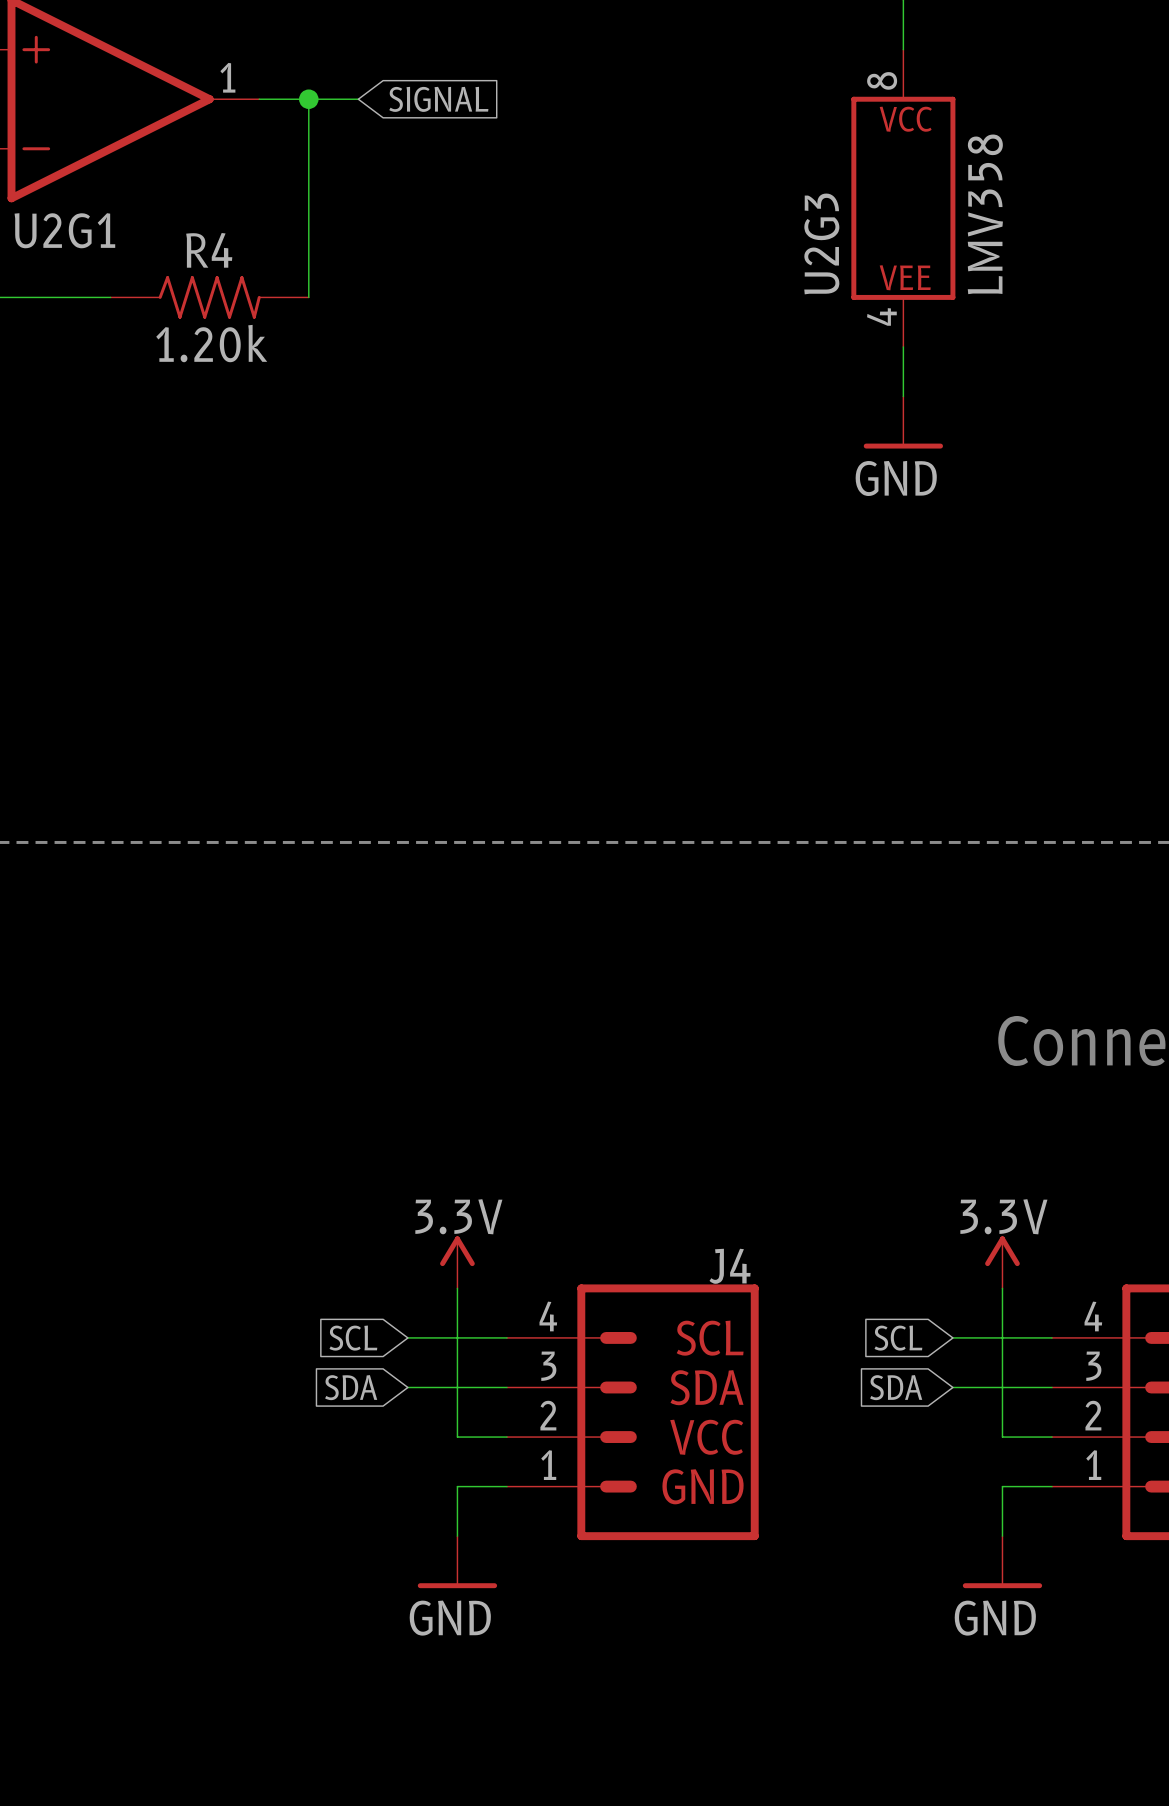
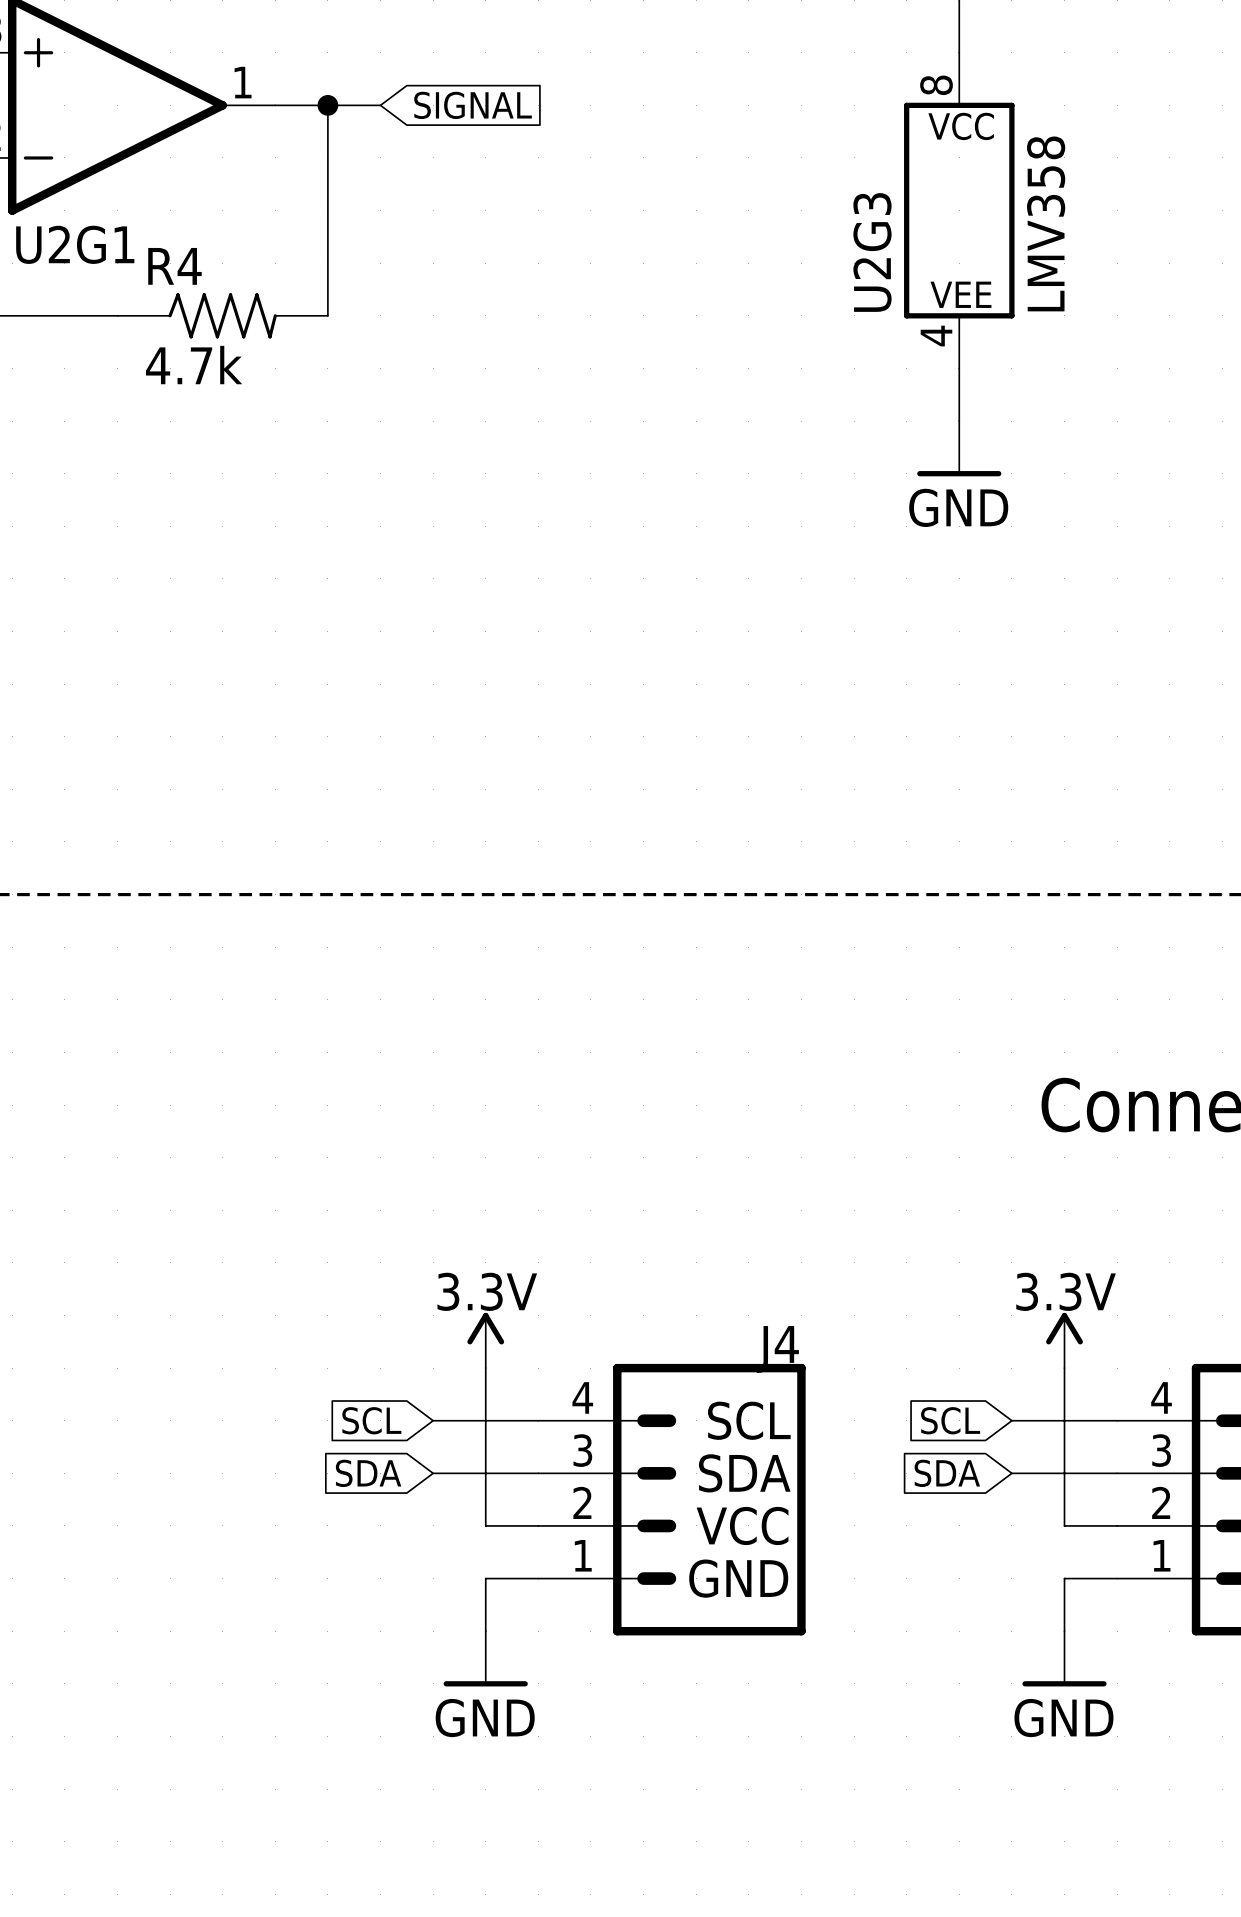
R4 name position: R4 (209, 250) -> R4 (174, 266)
R4 value: 1.20k (211, 343) -> 4.7k (194, 365)

